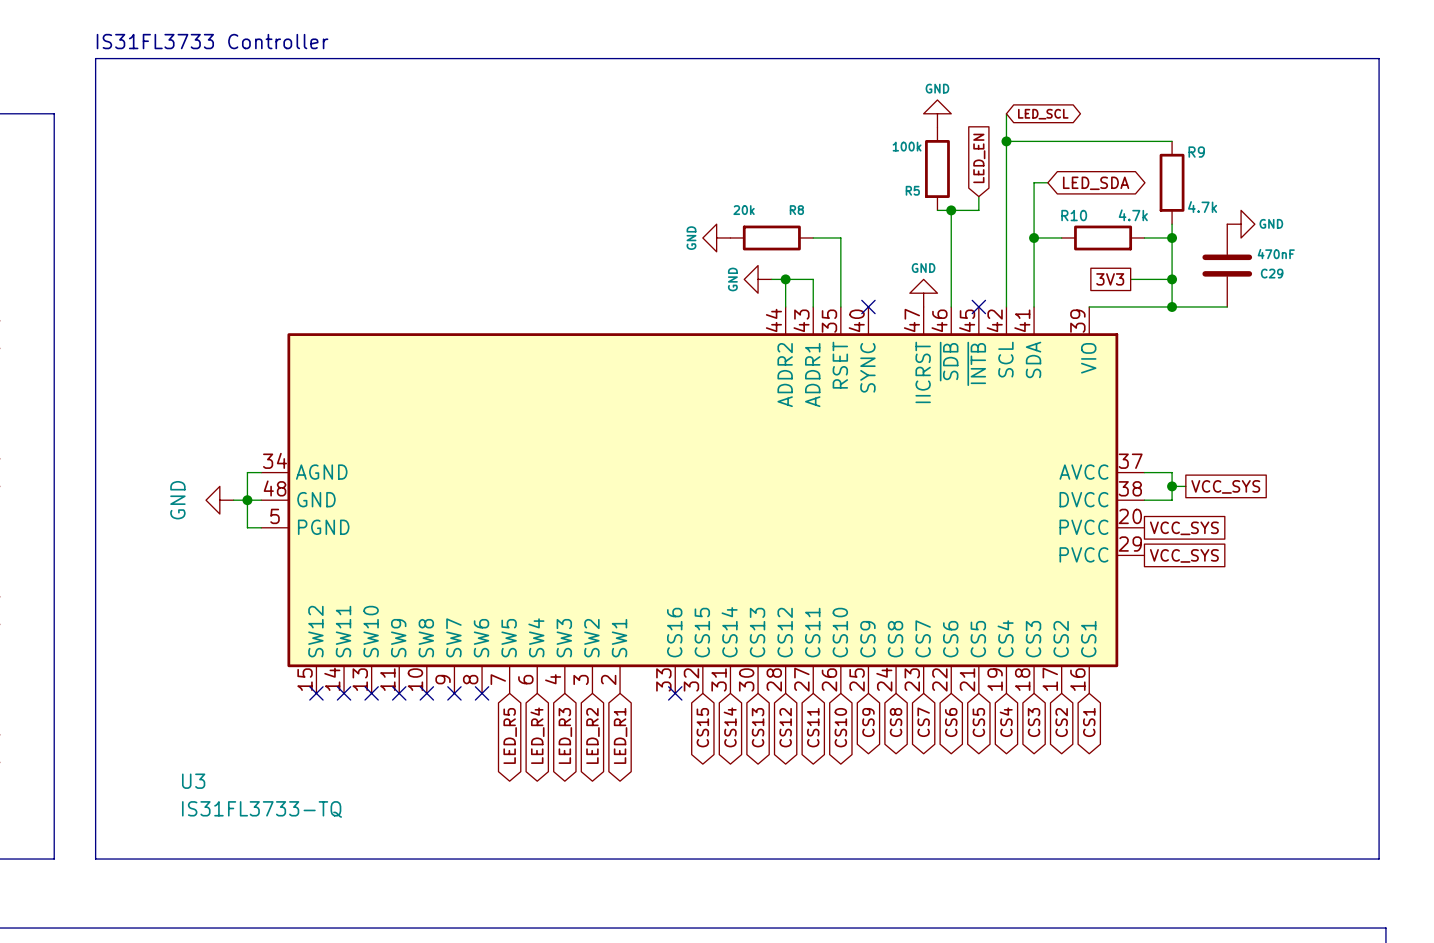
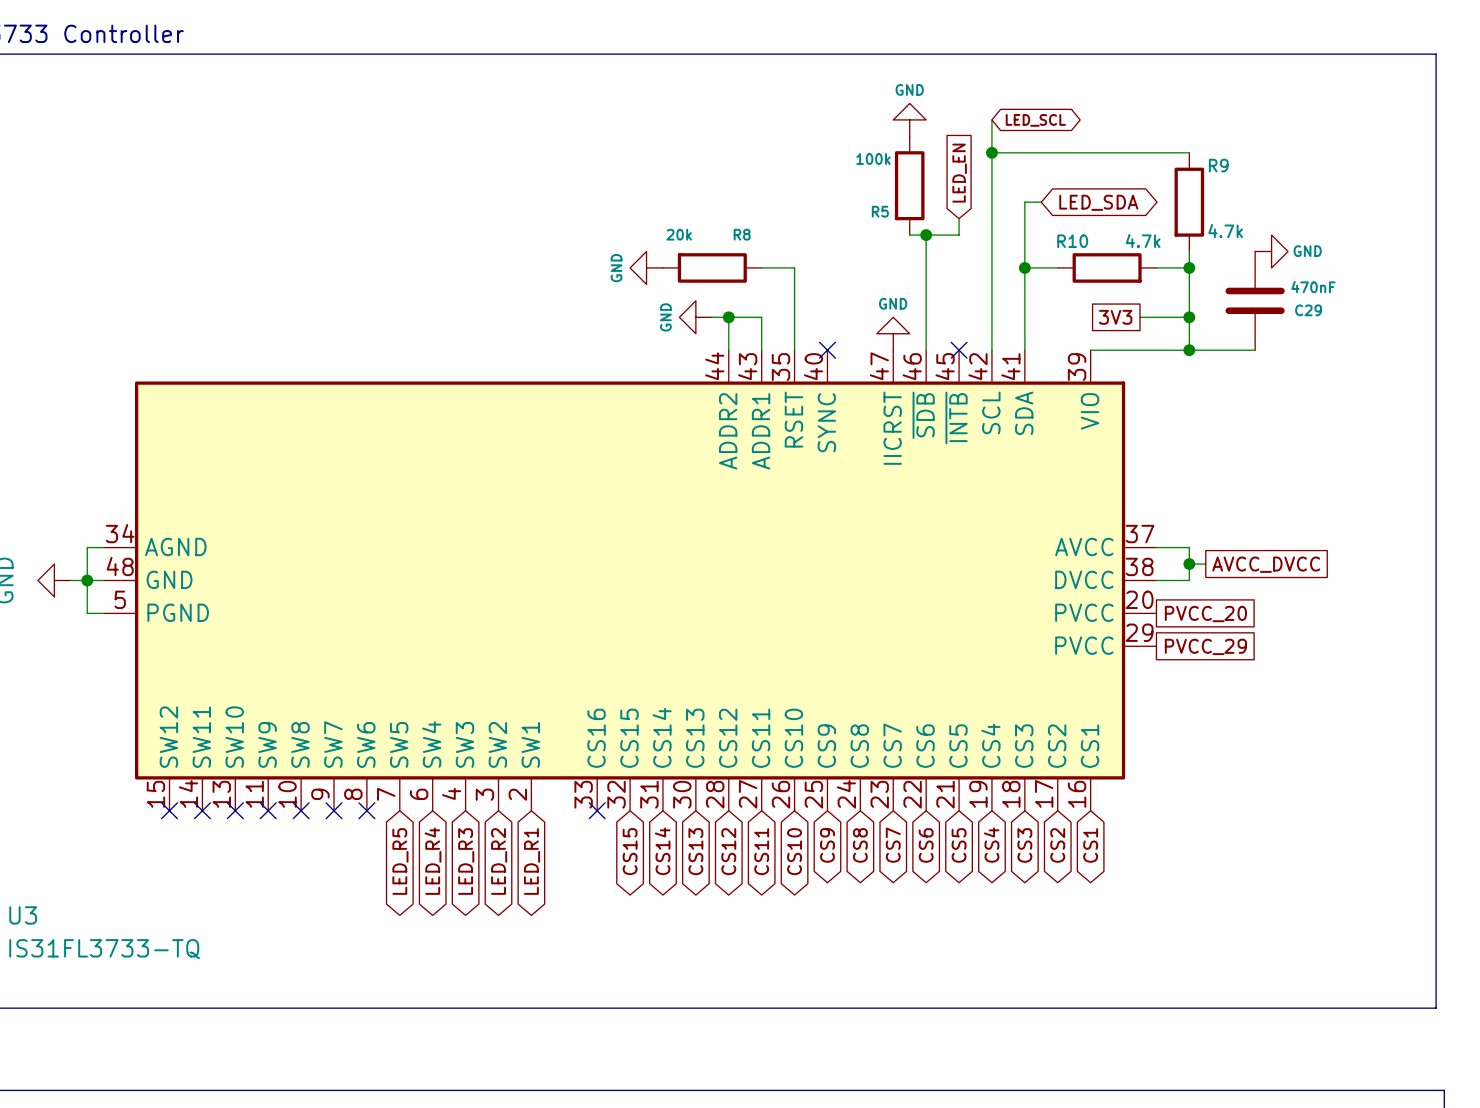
global label: VCC_SYS (1225, 486) -> AVCC_DVCC (1266, 564)
global label: VCC_SYS (1184, 528) -> PVCC_20 (1205, 614)
global label: VCC_SYS (1184, 555) -> PVCC_29 (1205, 646)

